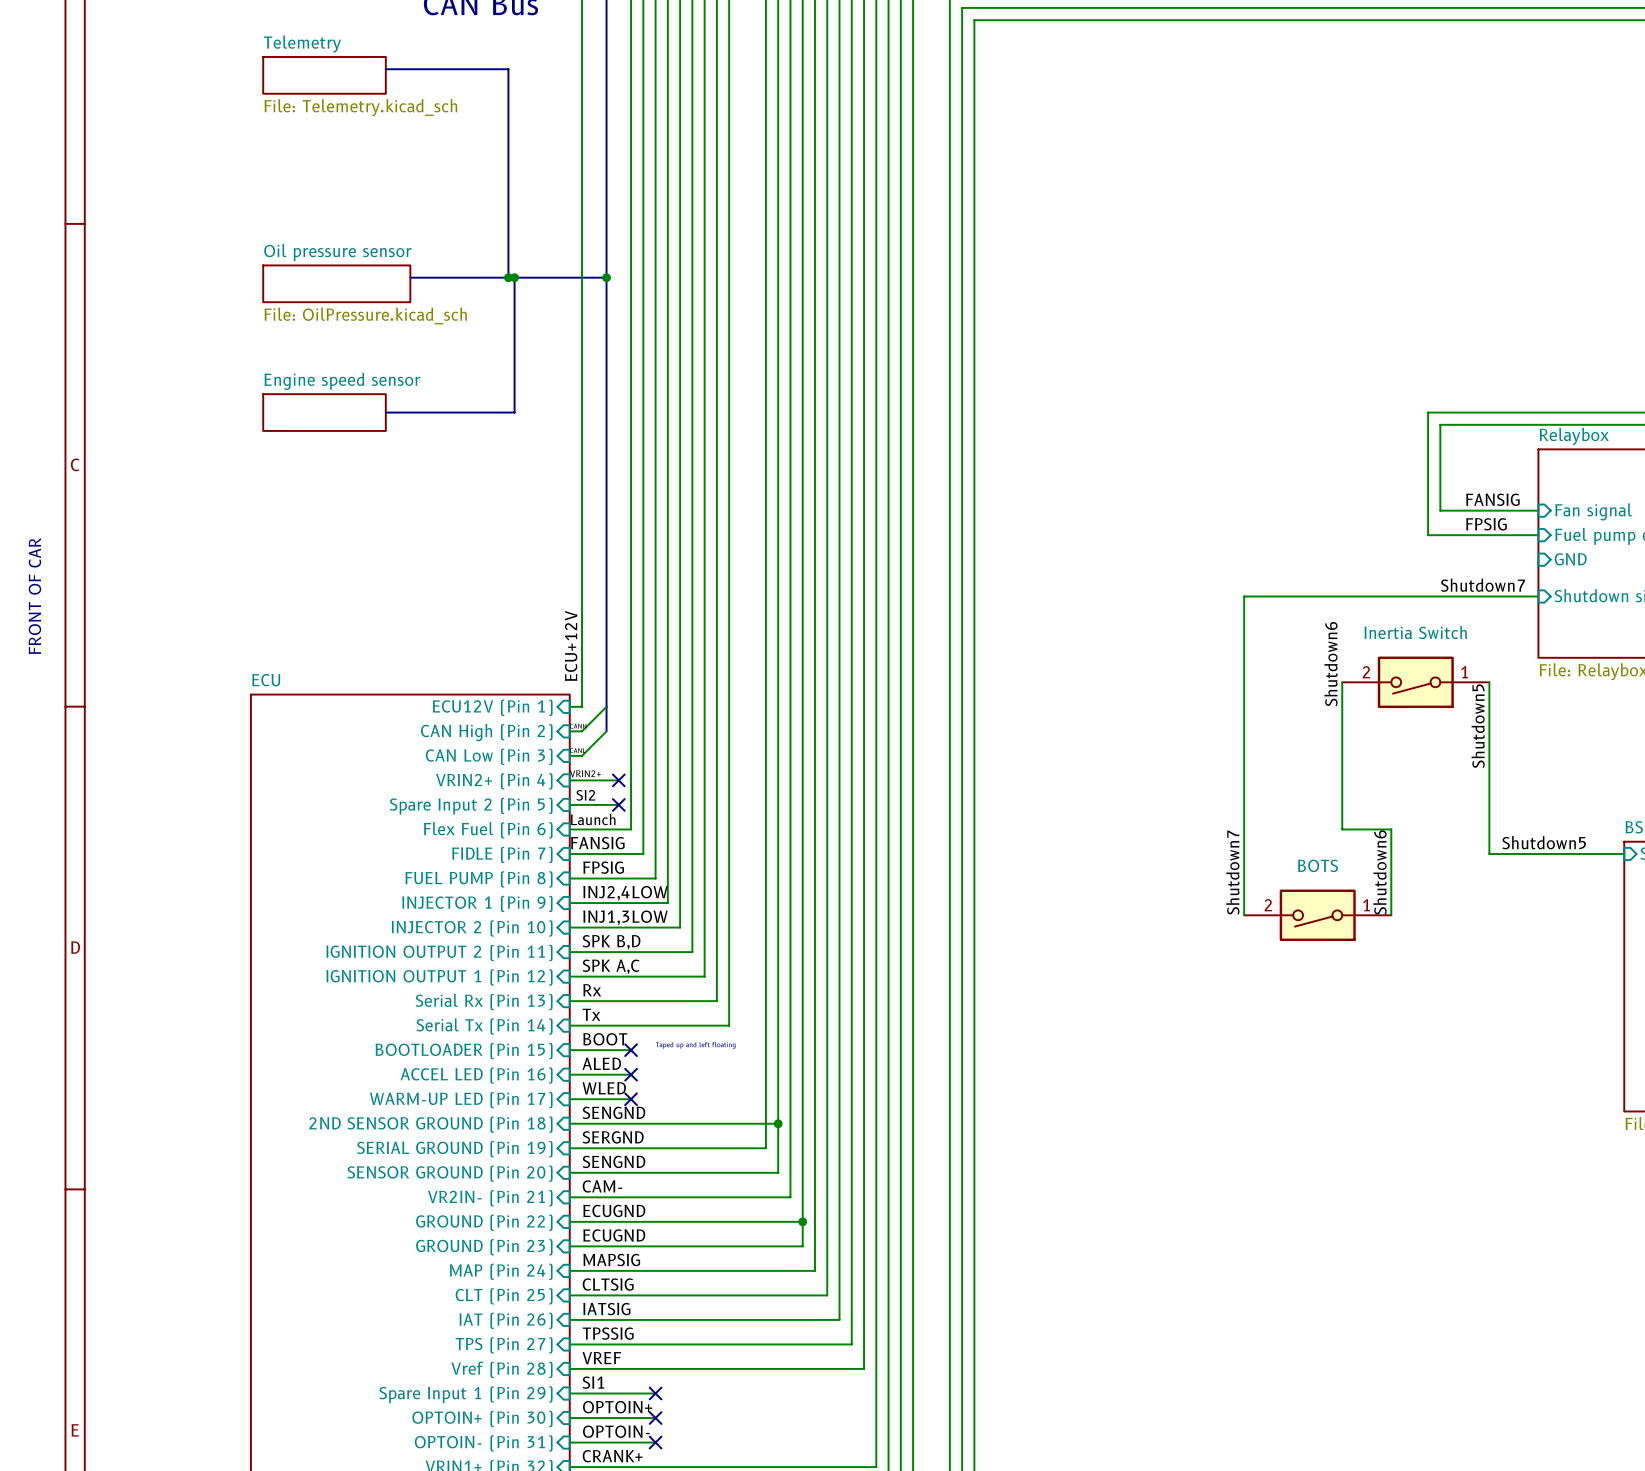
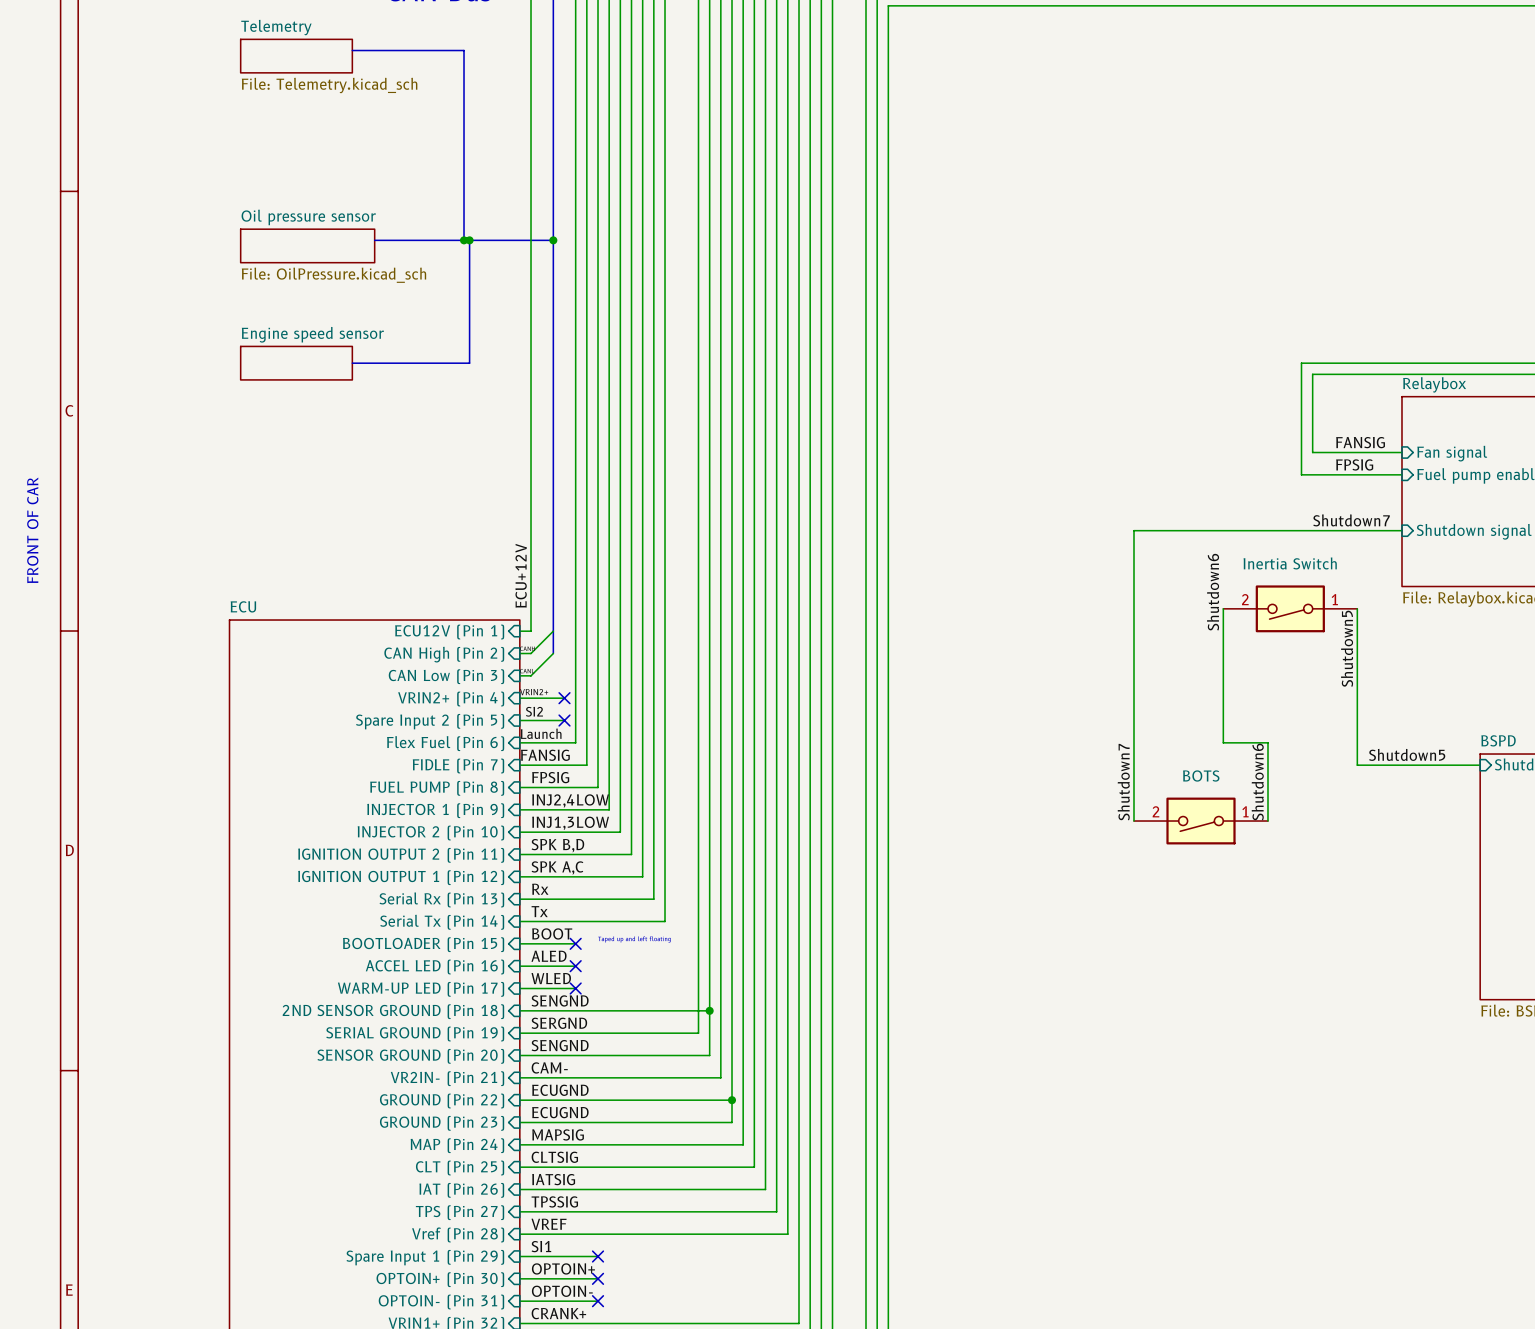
sheet pin: GND (1570, 559) -> none

